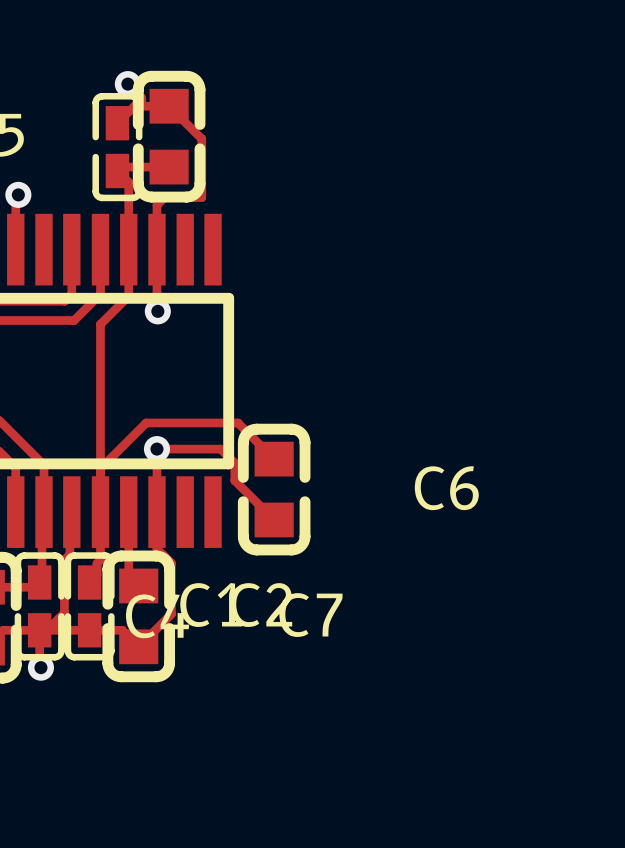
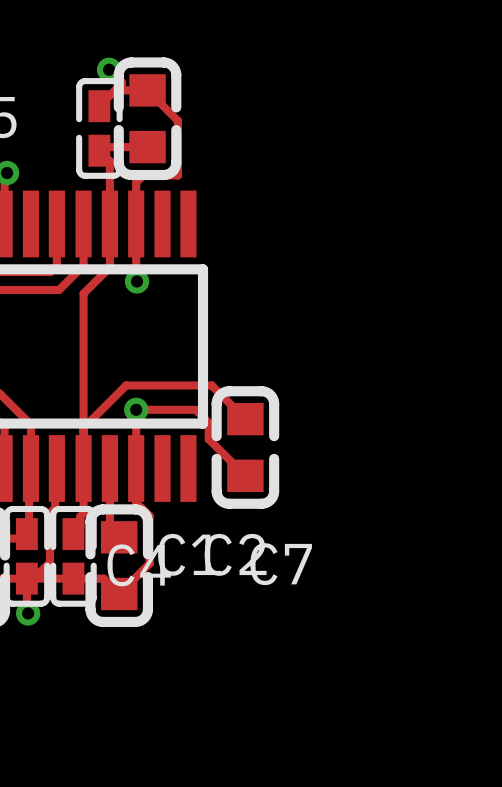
C6 name: C6 (446, 488) -> none

